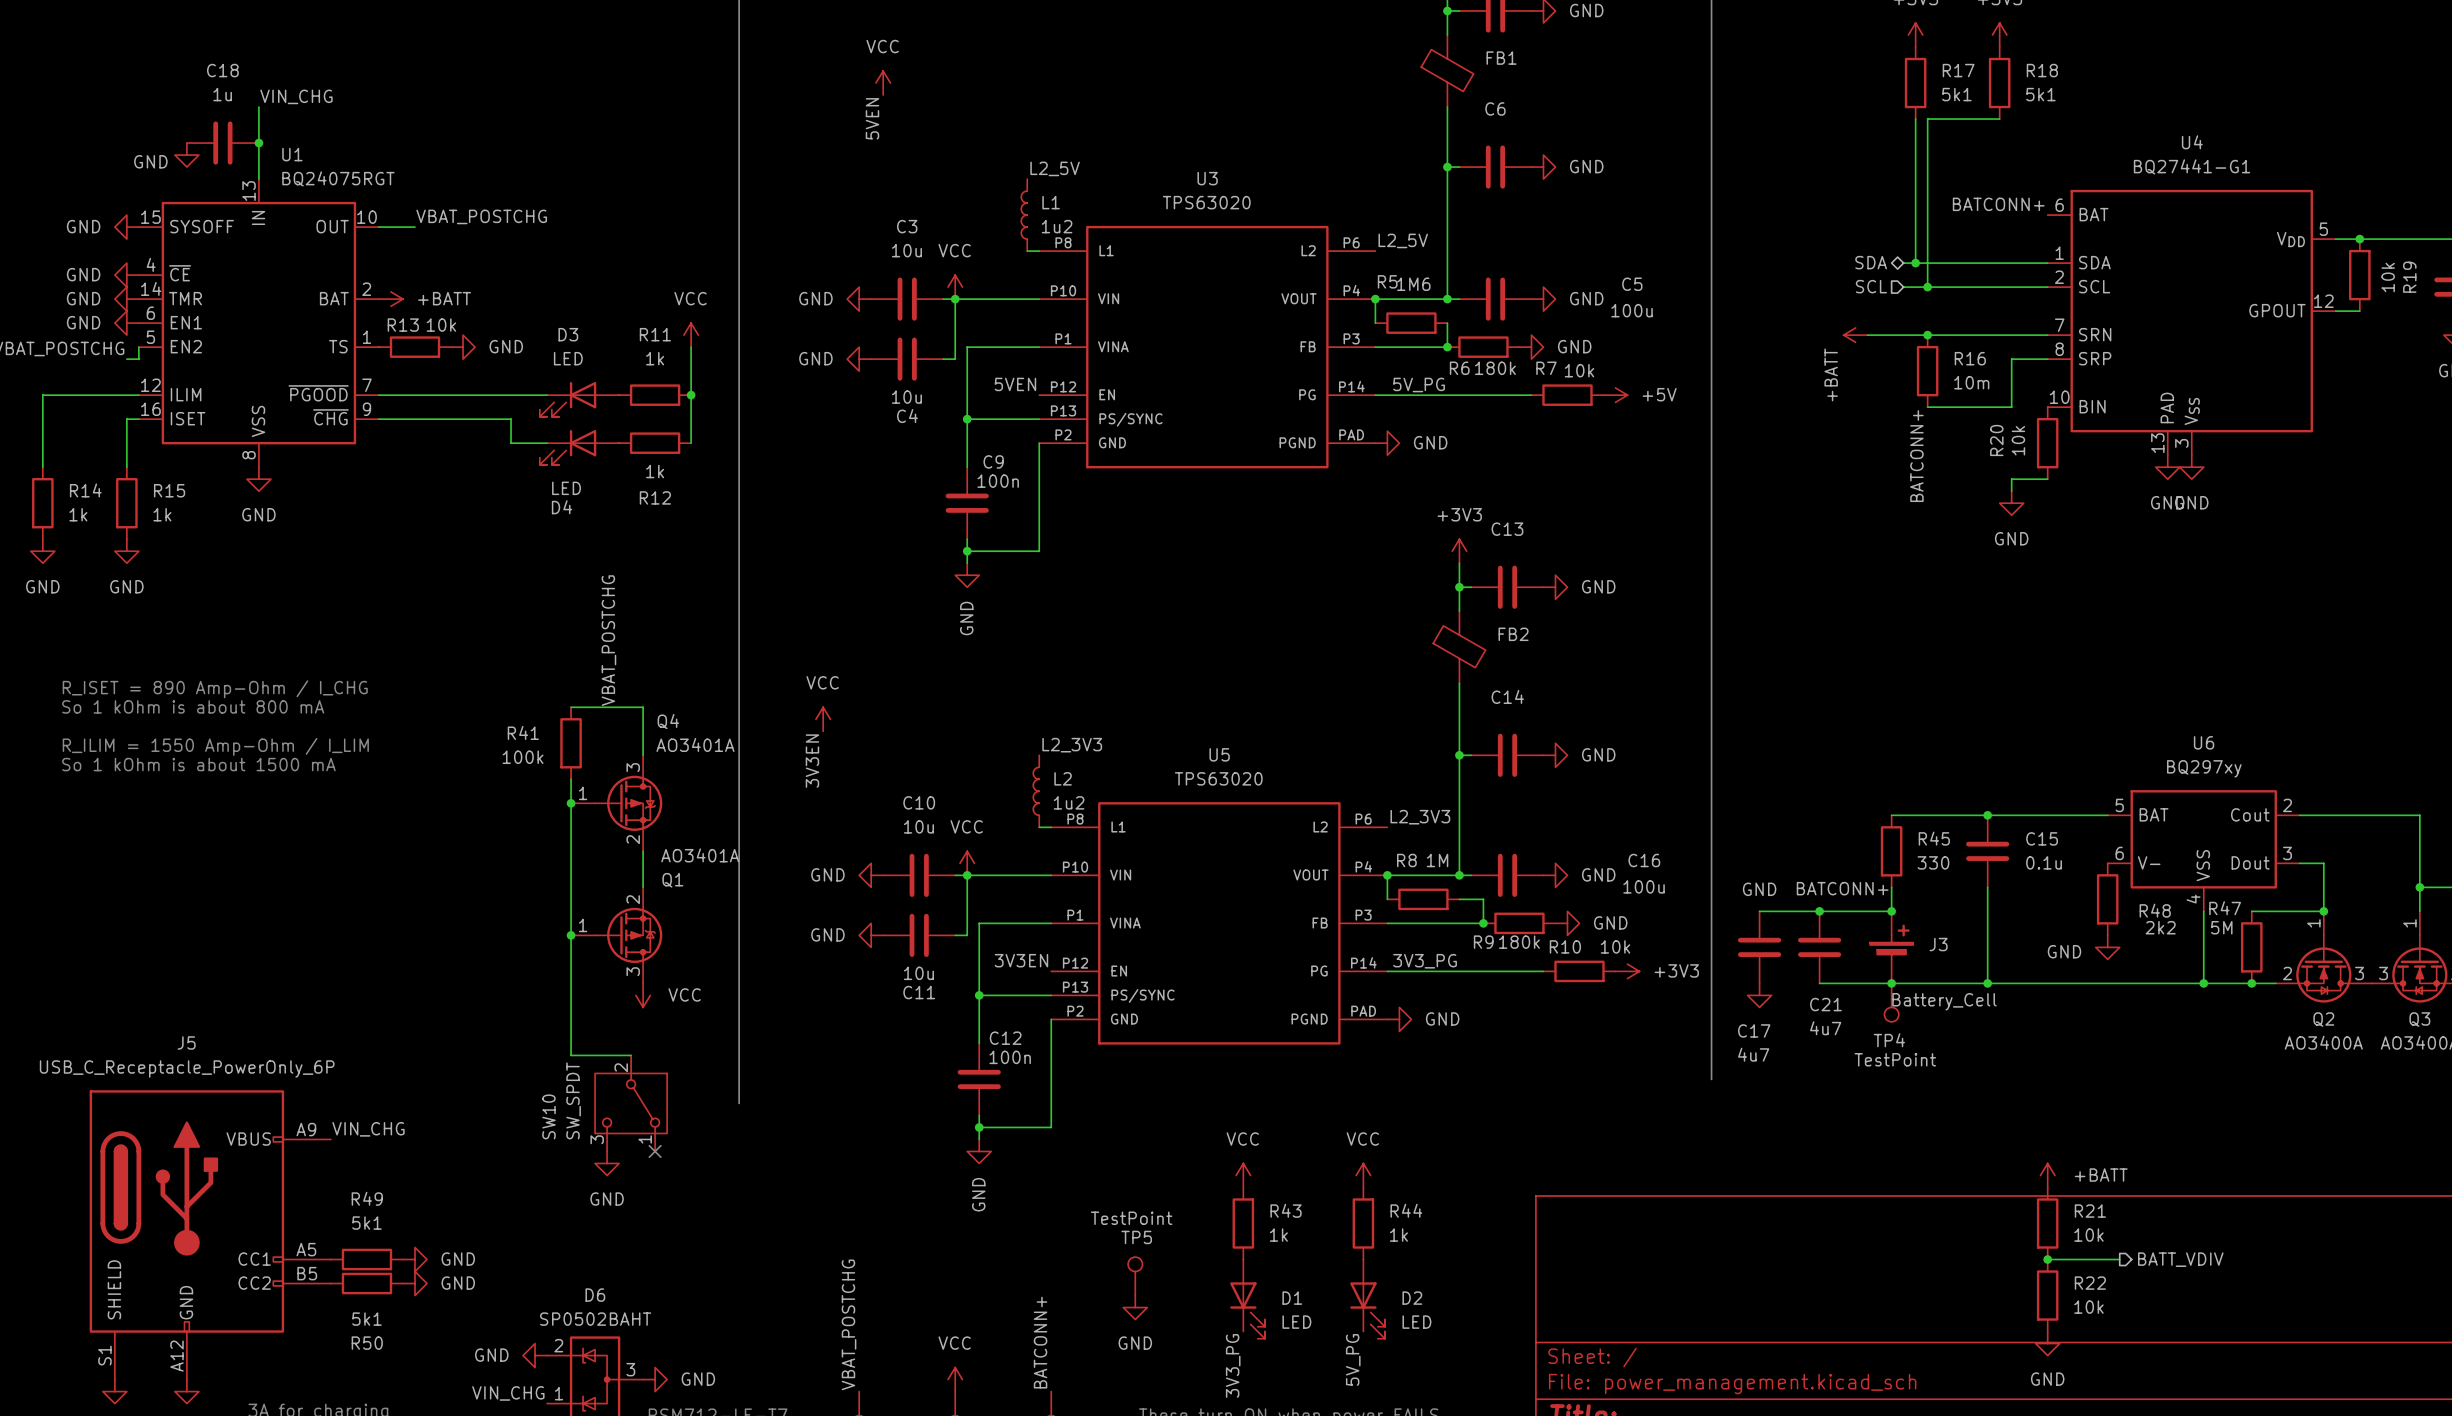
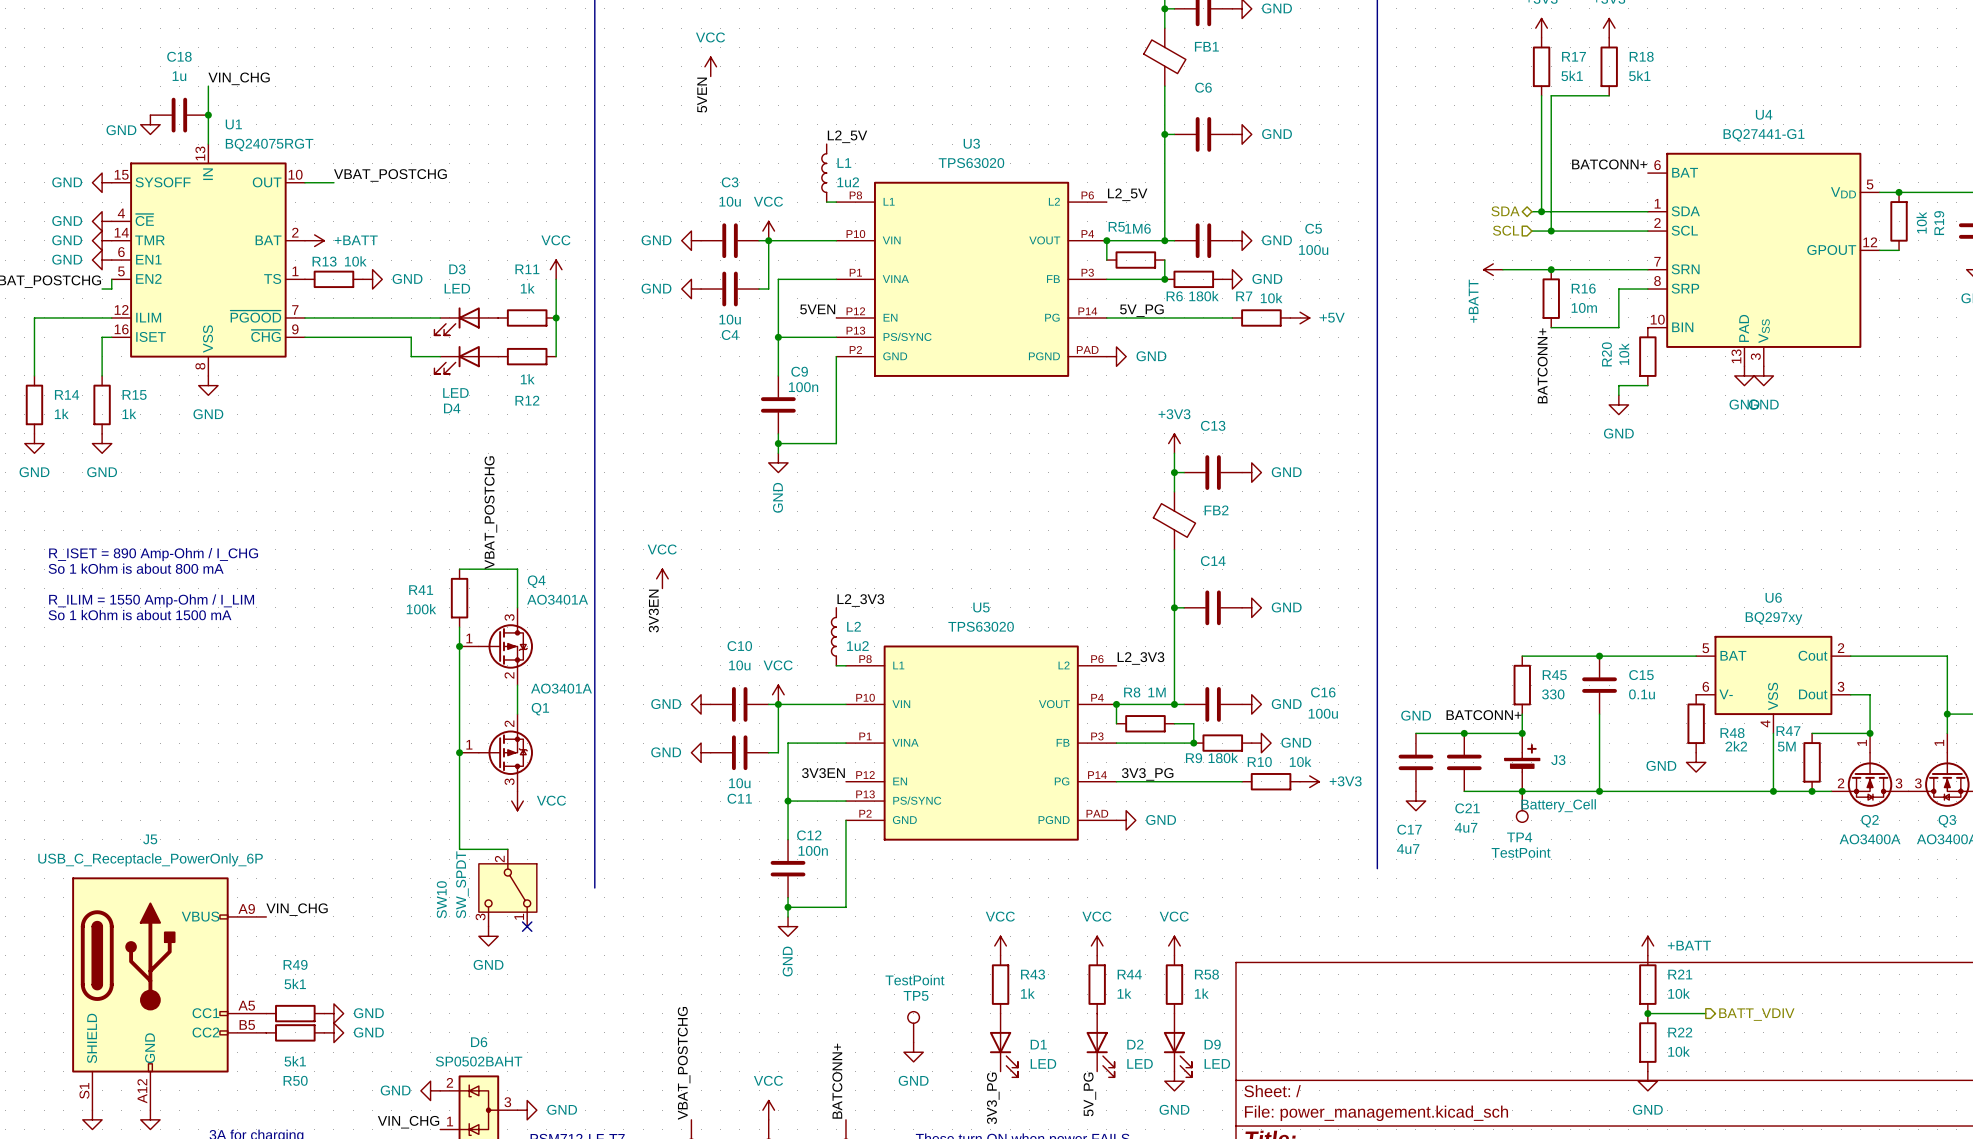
power symbol: none -> VCC (1174, 945)
R58: none -> 1k (1174, 984)
D9: none -> LED (1177, 1045)
power symbol: none -> GND (1174, 1081)

